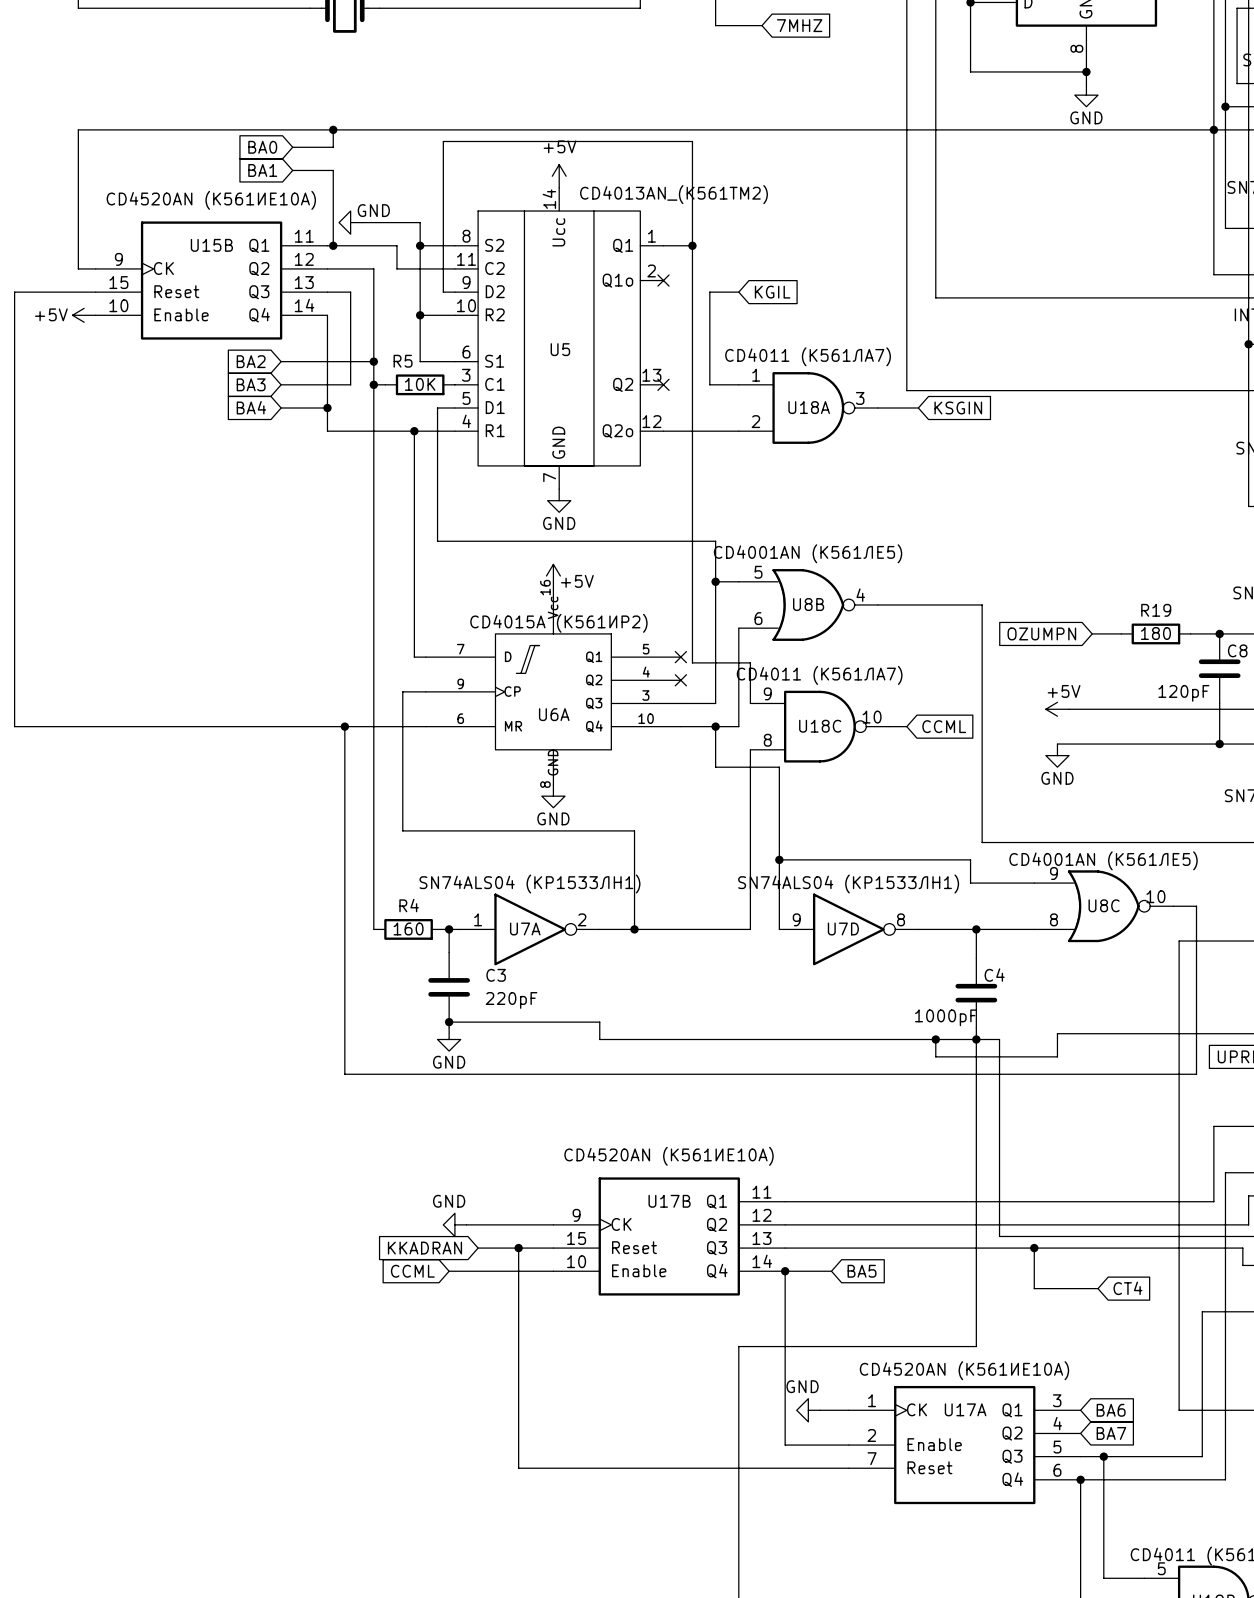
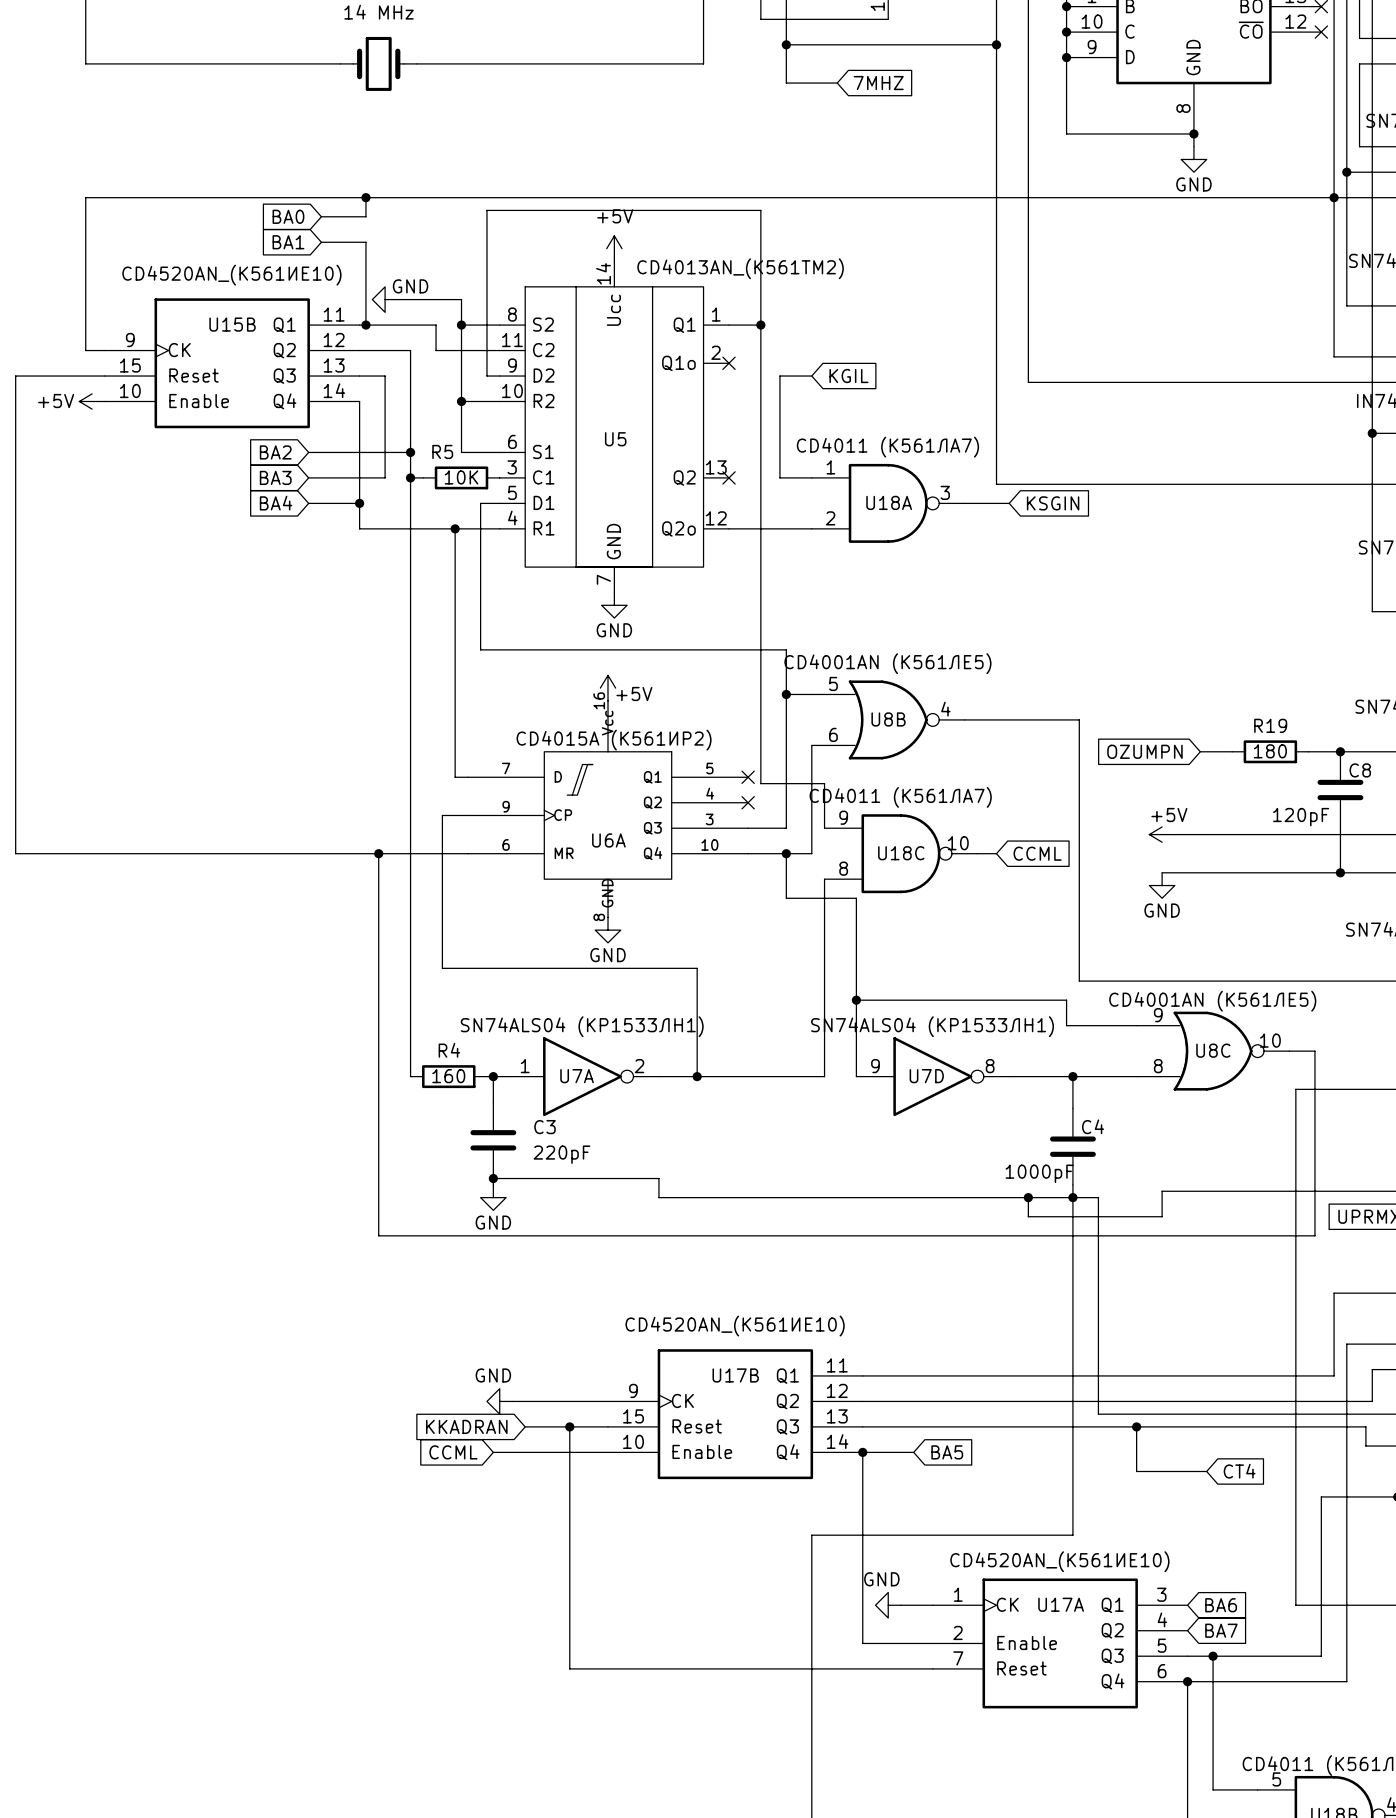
U15B value: CD4520АN (К561ИЕ10A) (211, 200) -> CD4520АN_(К561ИЕ10) (231, 275)
U17B value: CD4520АN (К561ИЕ10A) (669, 1156) -> CD4520АN_(К561ИЕ10) (735, 1326)
U17A value: CD4520АN (К561ИЕ10A) (964, 1370) -> CD4520АN_(К561ИЕ10) (1059, 1561)

